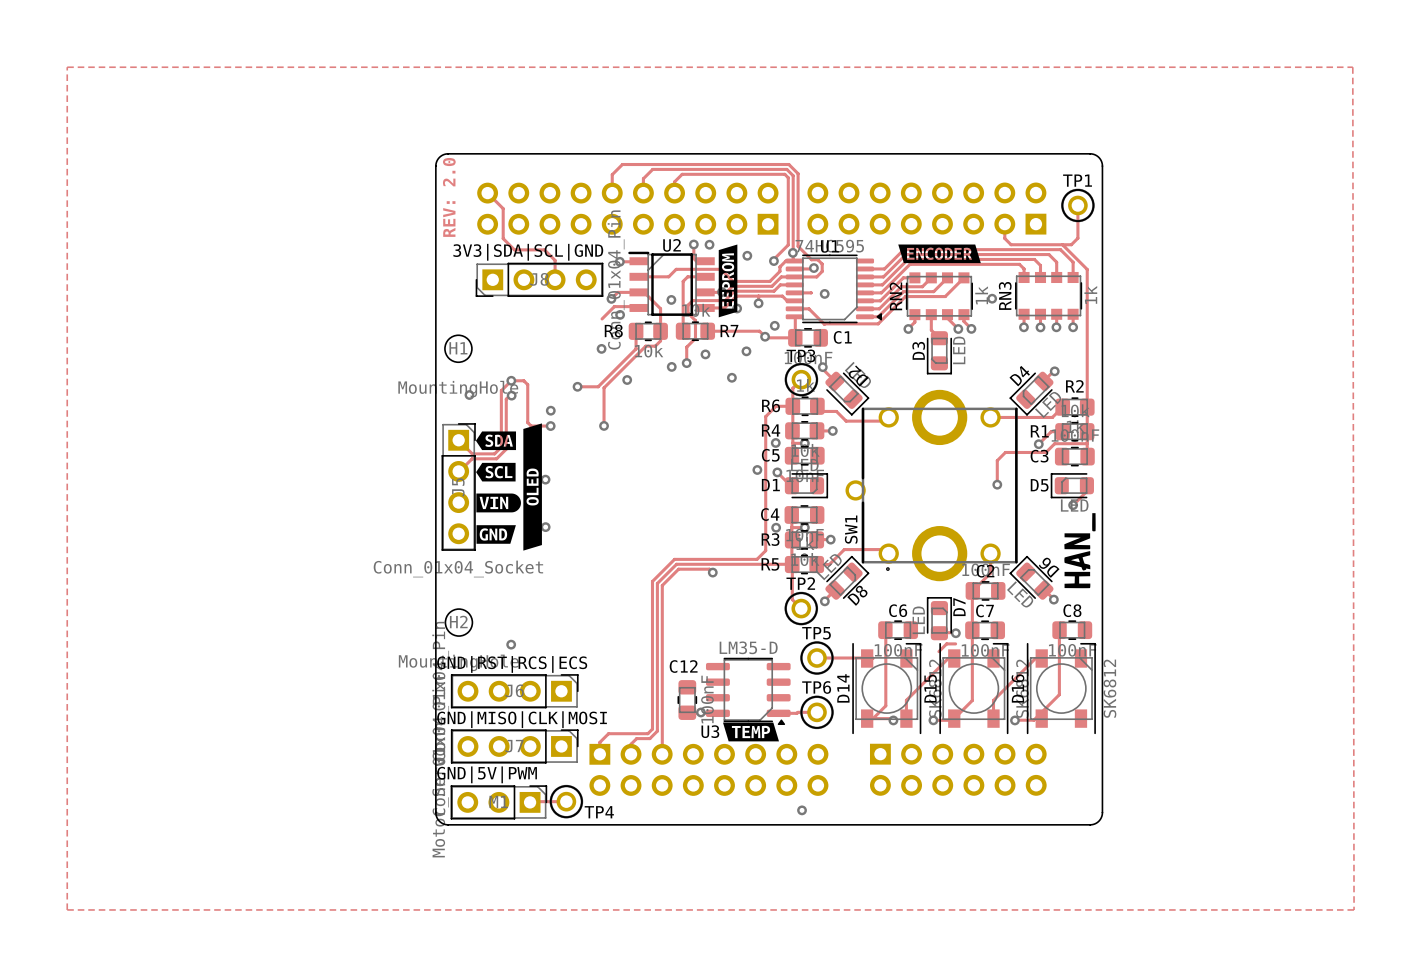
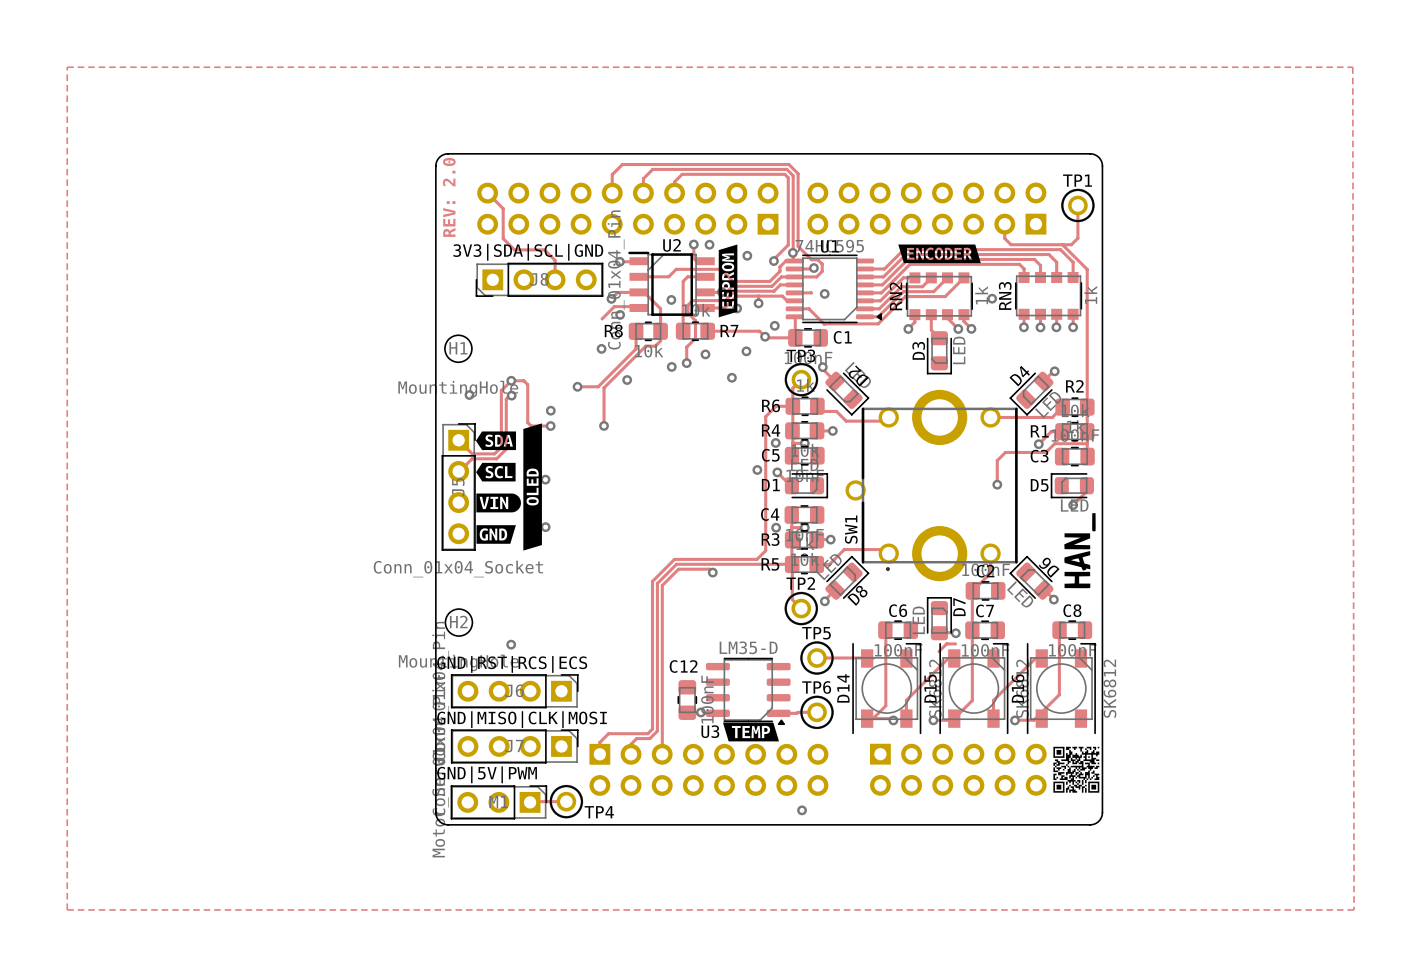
drawing: none -> [1053, 746, 1100, 793]

